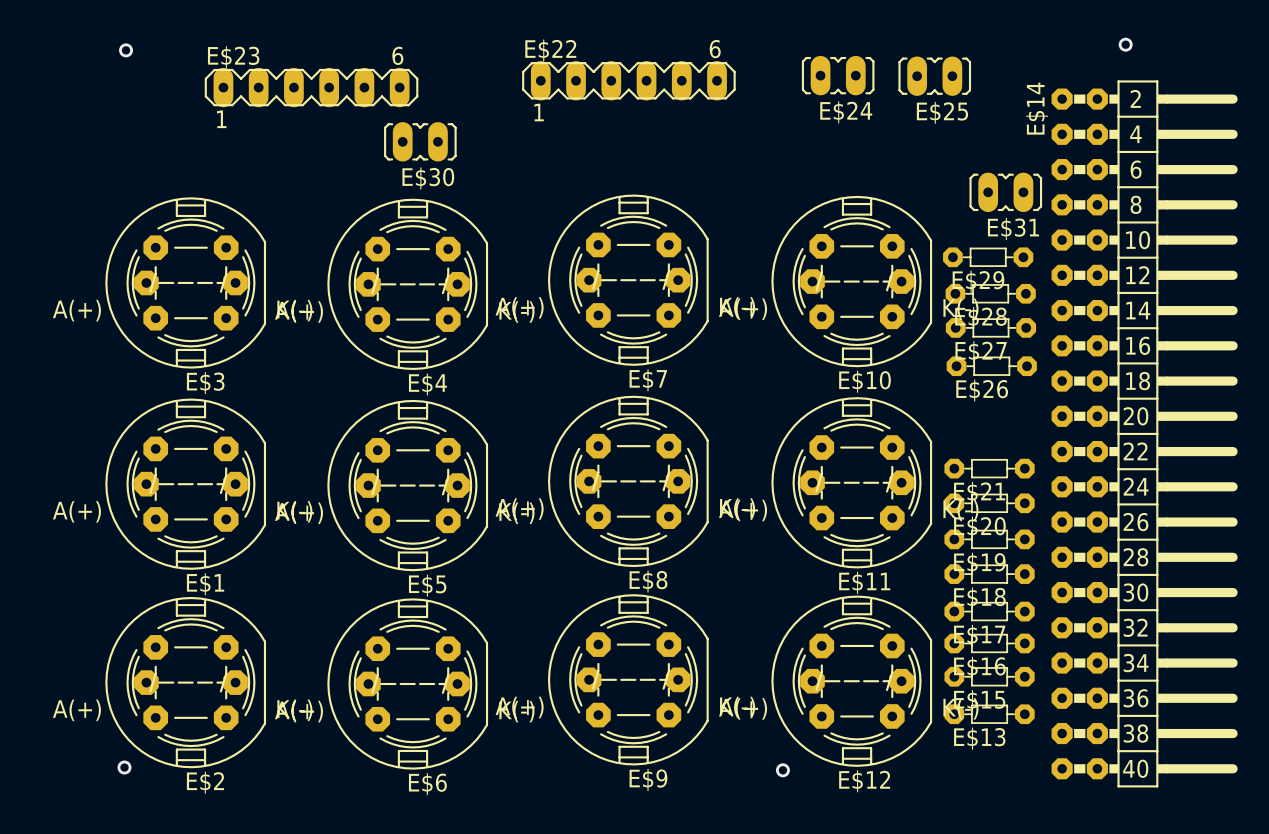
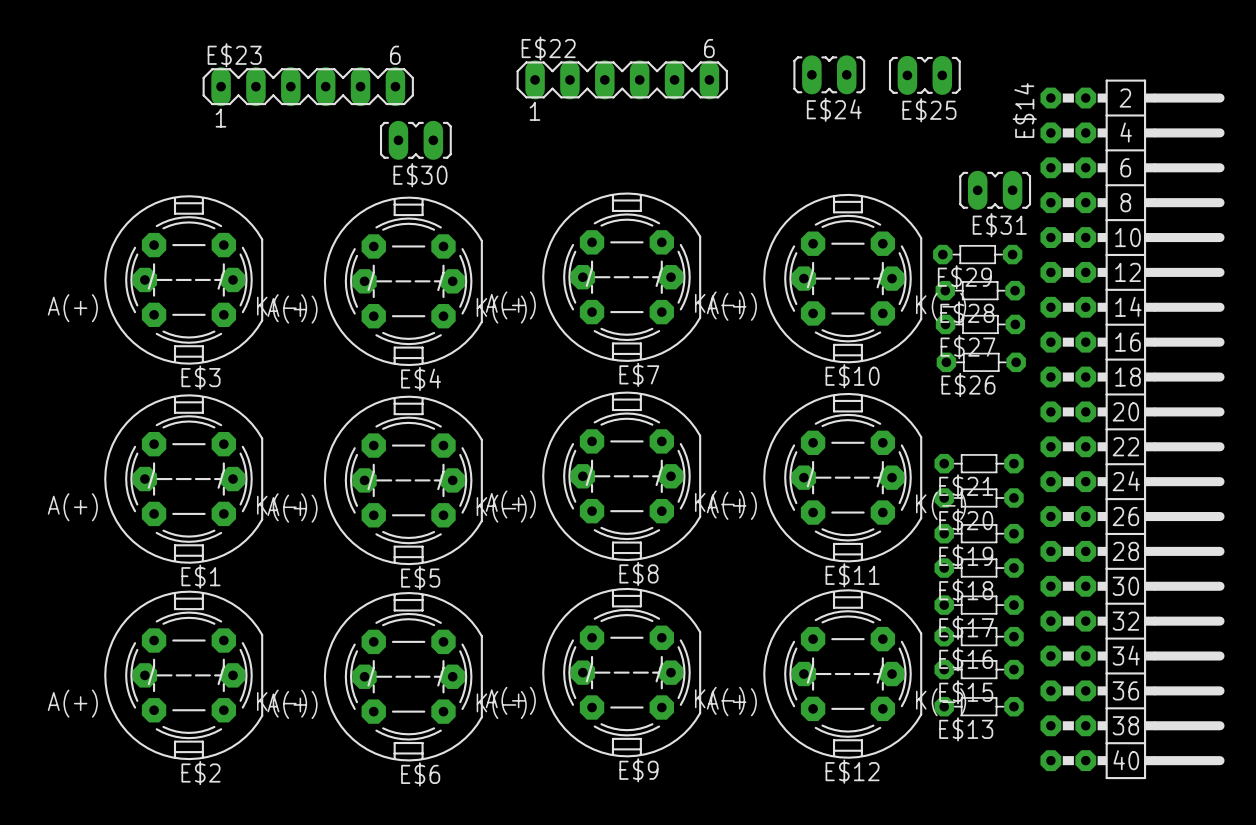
via: (1125, 44) -> none
via: (126, 50) -> none
via: (124, 767) -> none
via: (782, 770) -> none

